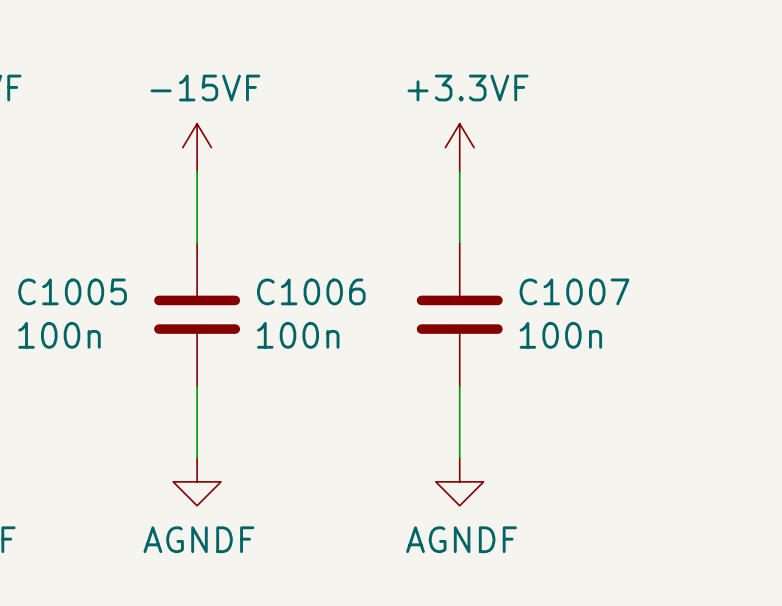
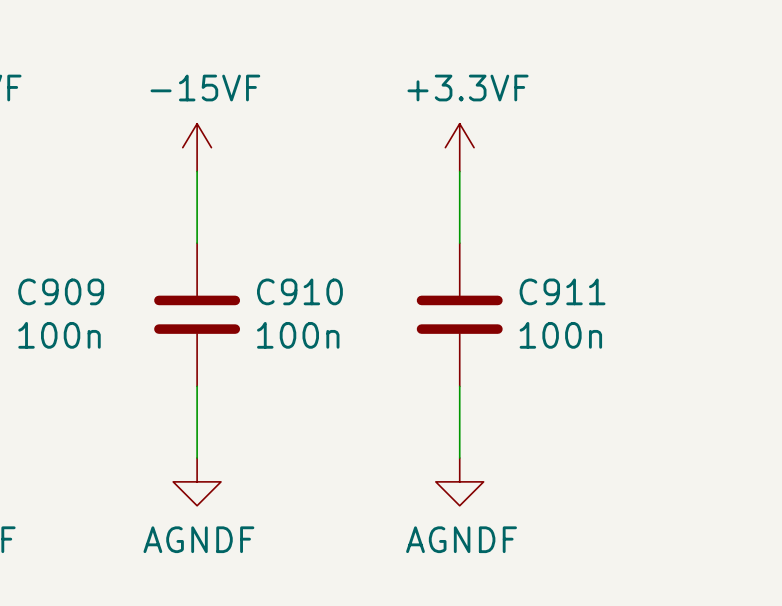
C1005 name: C1005 (72, 291) -> C909 (61, 291)
C1006 name: C1006 (311, 291) -> C910 (299, 291)
C1007 name: C1007 (574, 291) -> C911 (562, 291)

